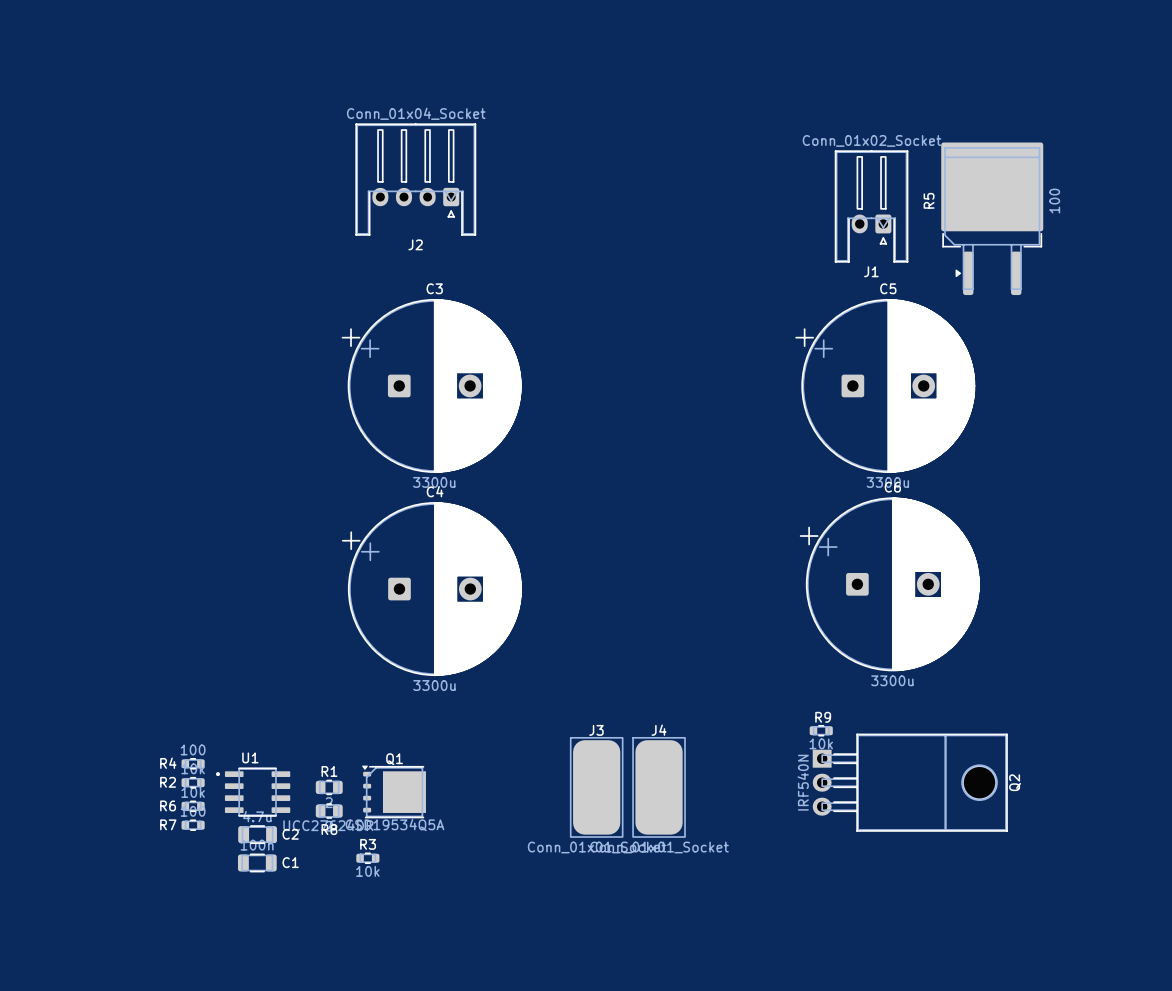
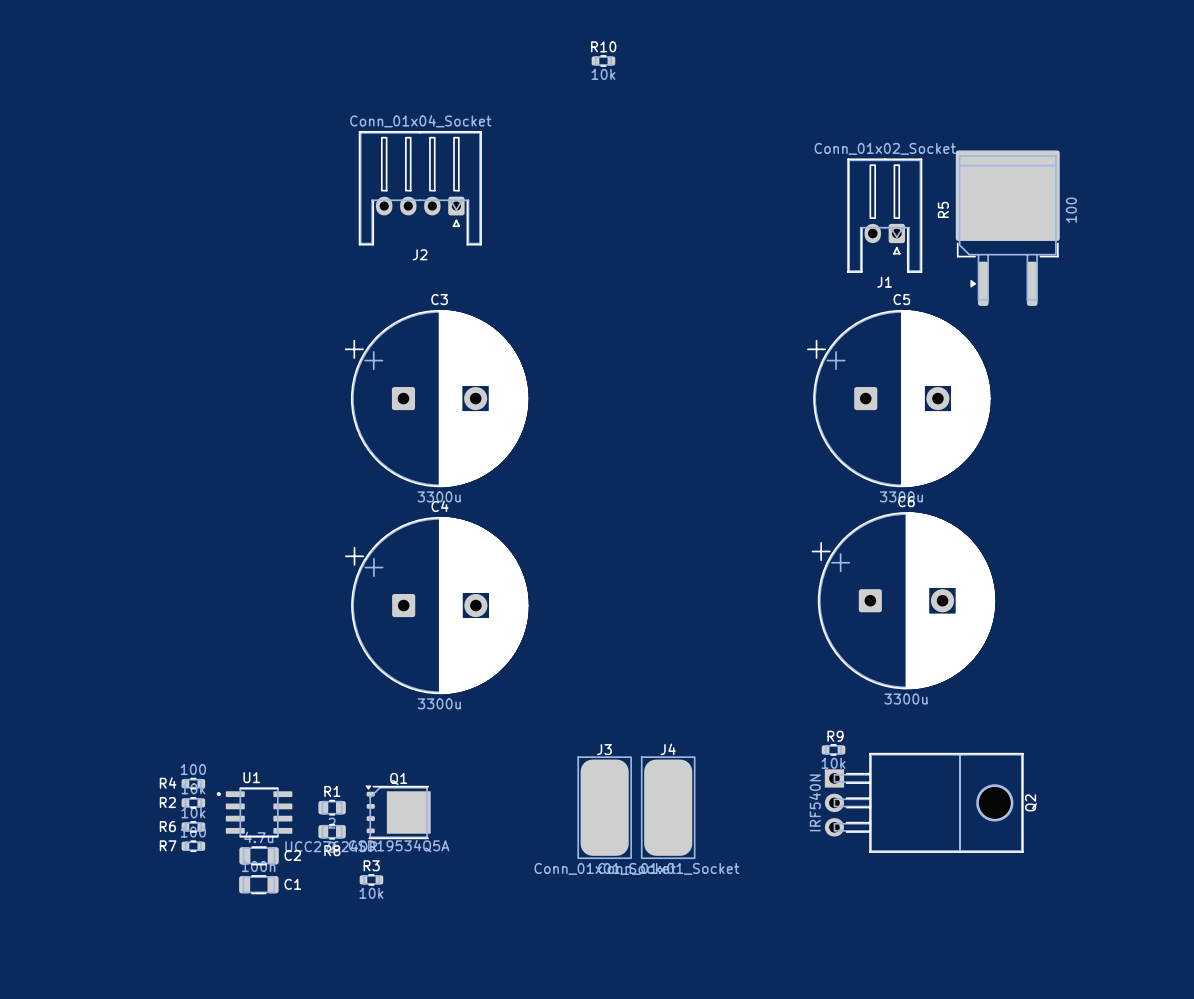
R10: none -> 10k (603, 60)

